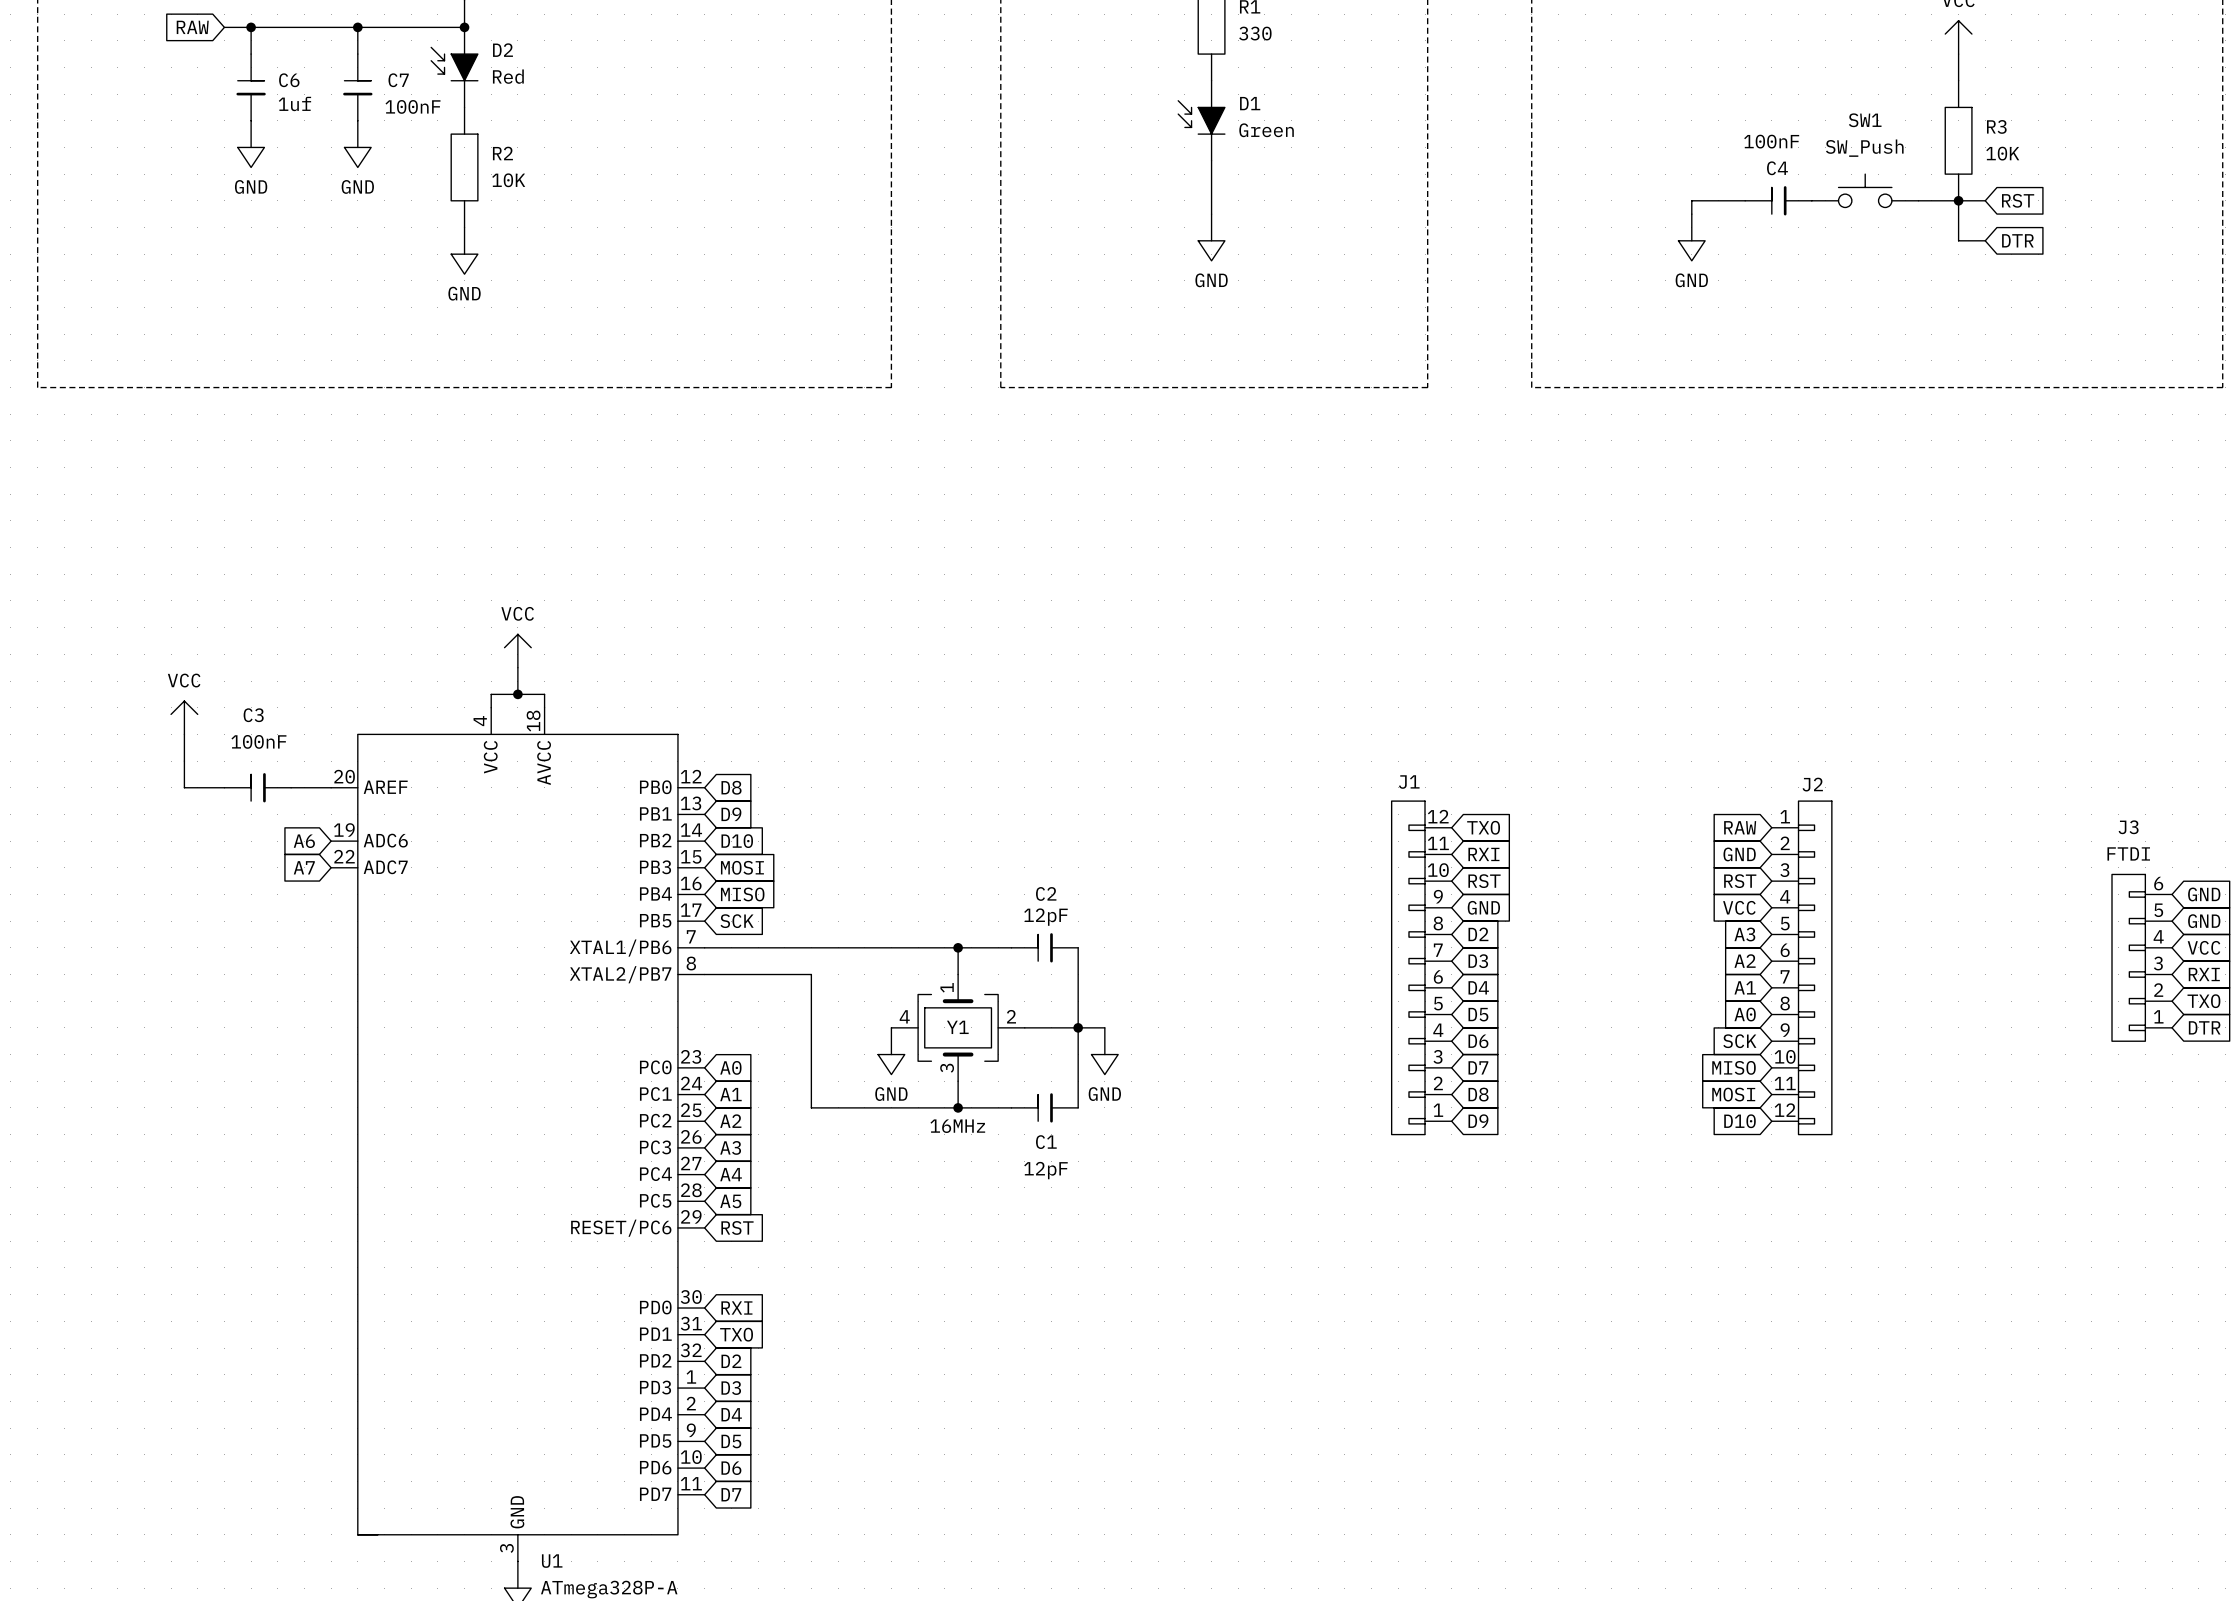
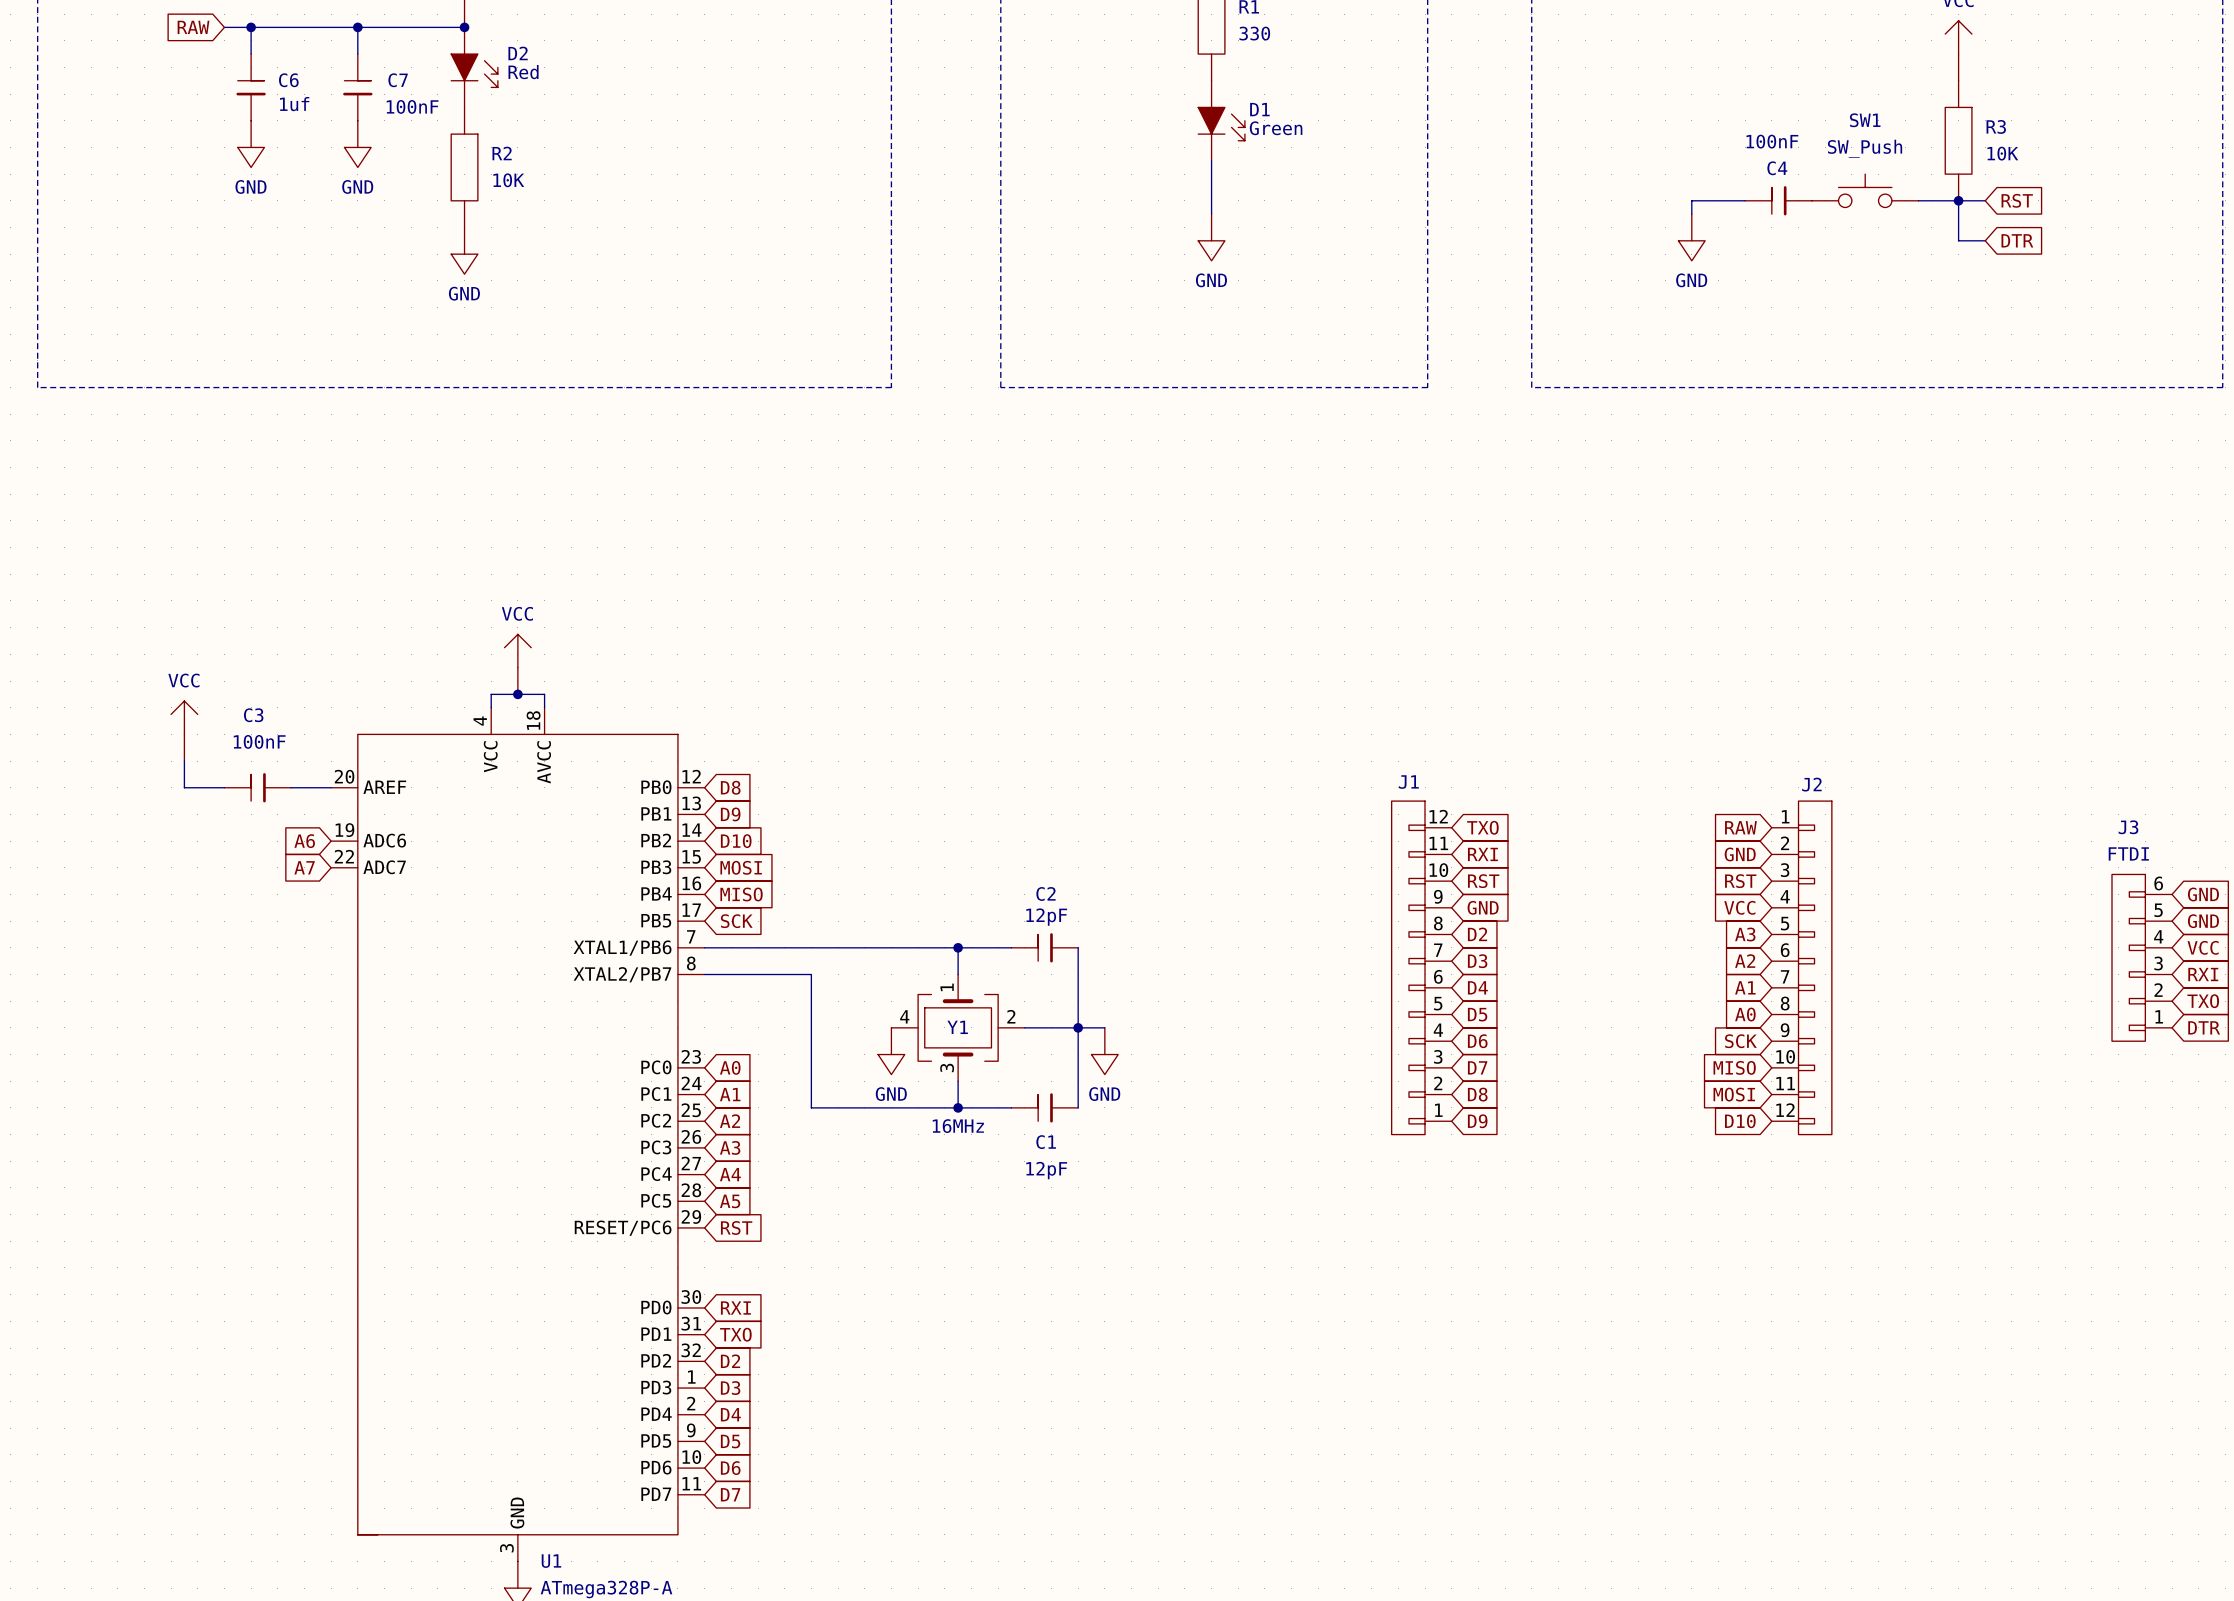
D2 symbol: [431, 27, 478, 108] -> [451, 27, 498, 108]
D1 symbol: [1178, 80, 1225, 161] -> [1198, 80, 1245, 161]

